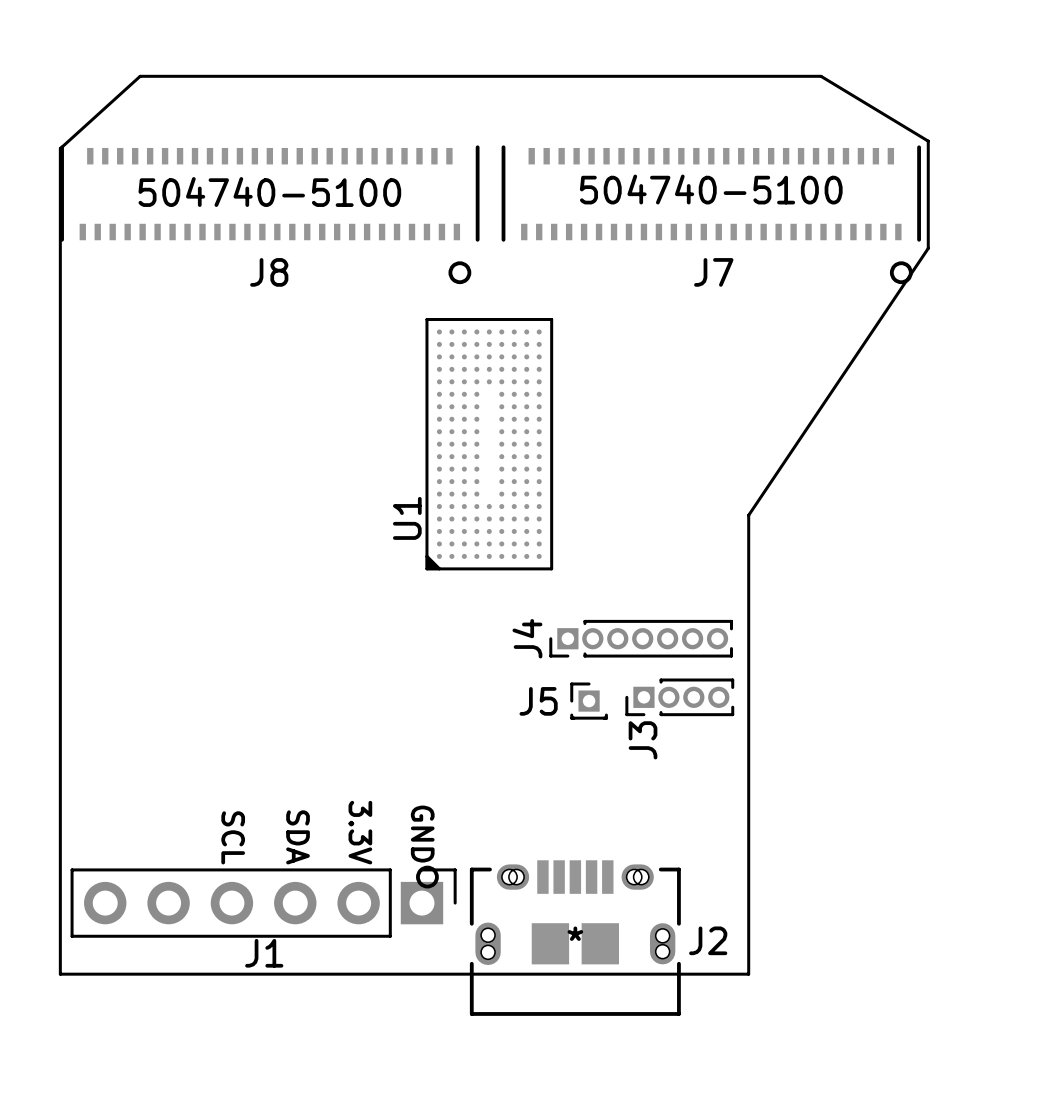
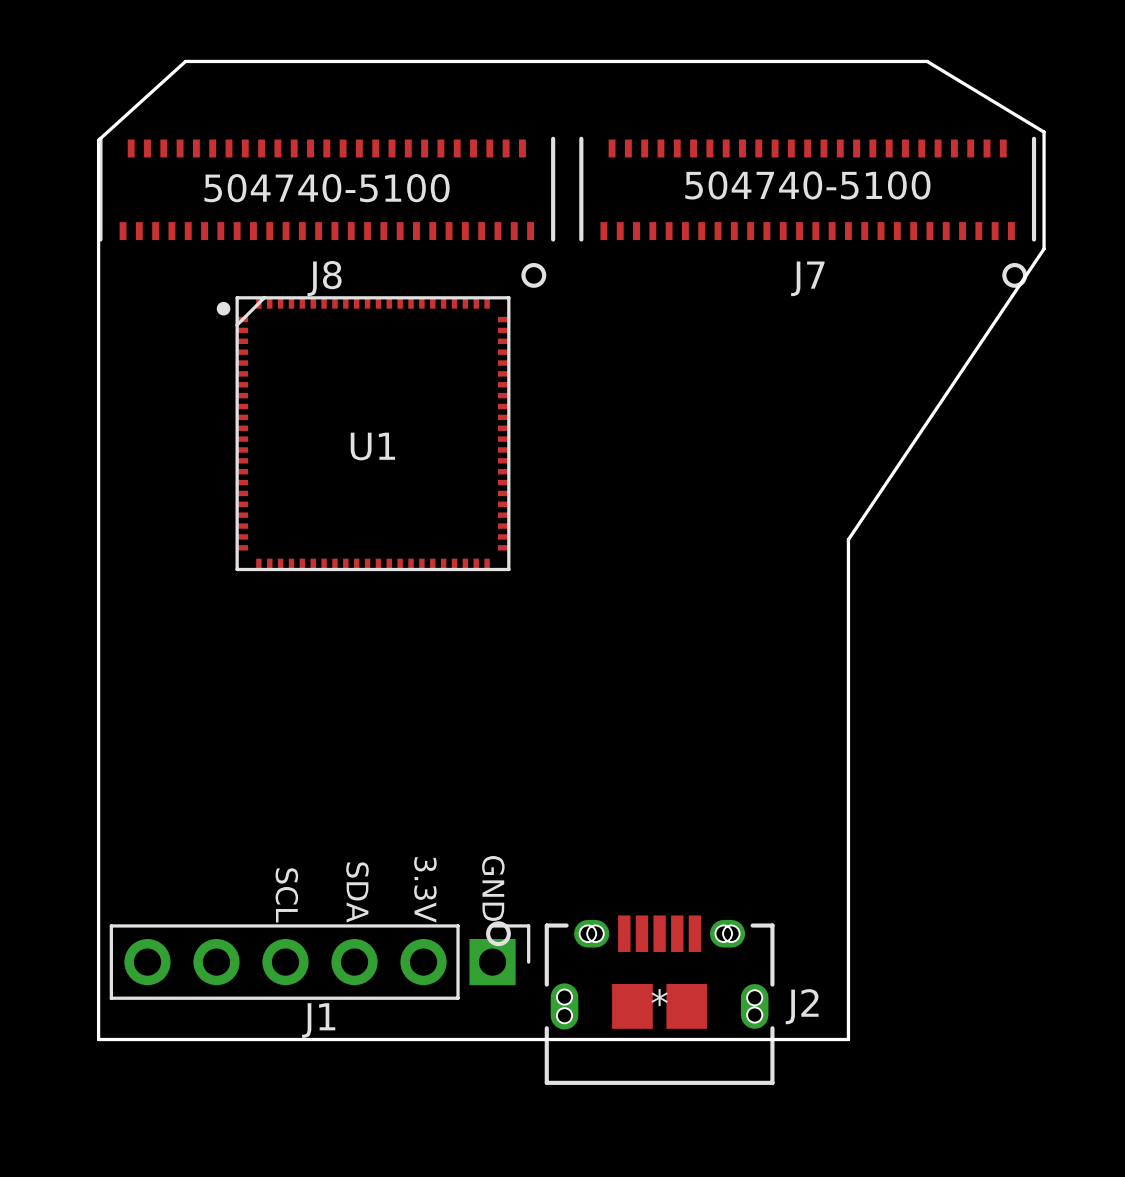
U1 footprint: [425, 317, 554, 571] -> [216, 296, 511, 572]
U1 name position: U1 (407, 518) -> U1 (372, 446)
J4: (641, 638) -> none
J3: (679, 697) -> none
J5: (589, 701) -> none

